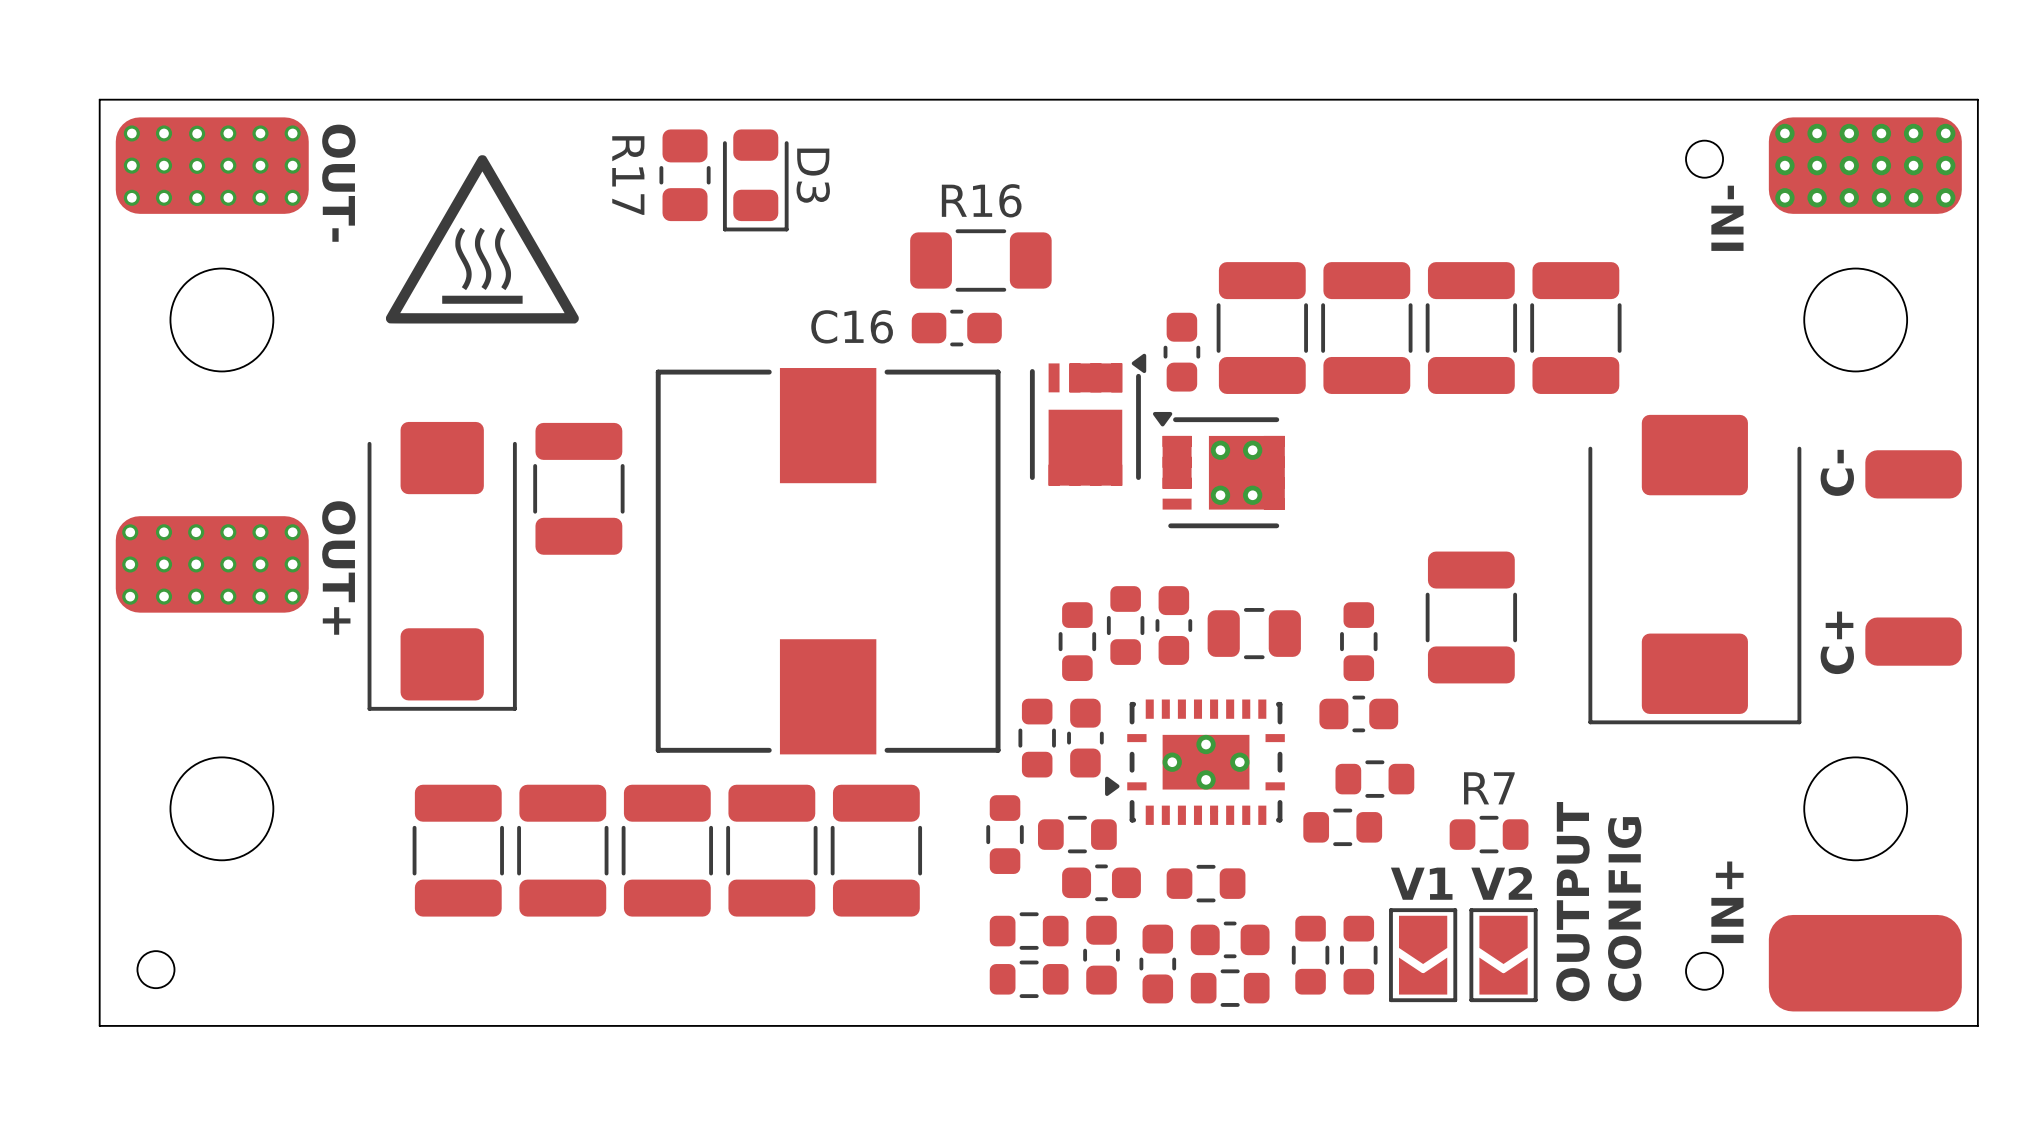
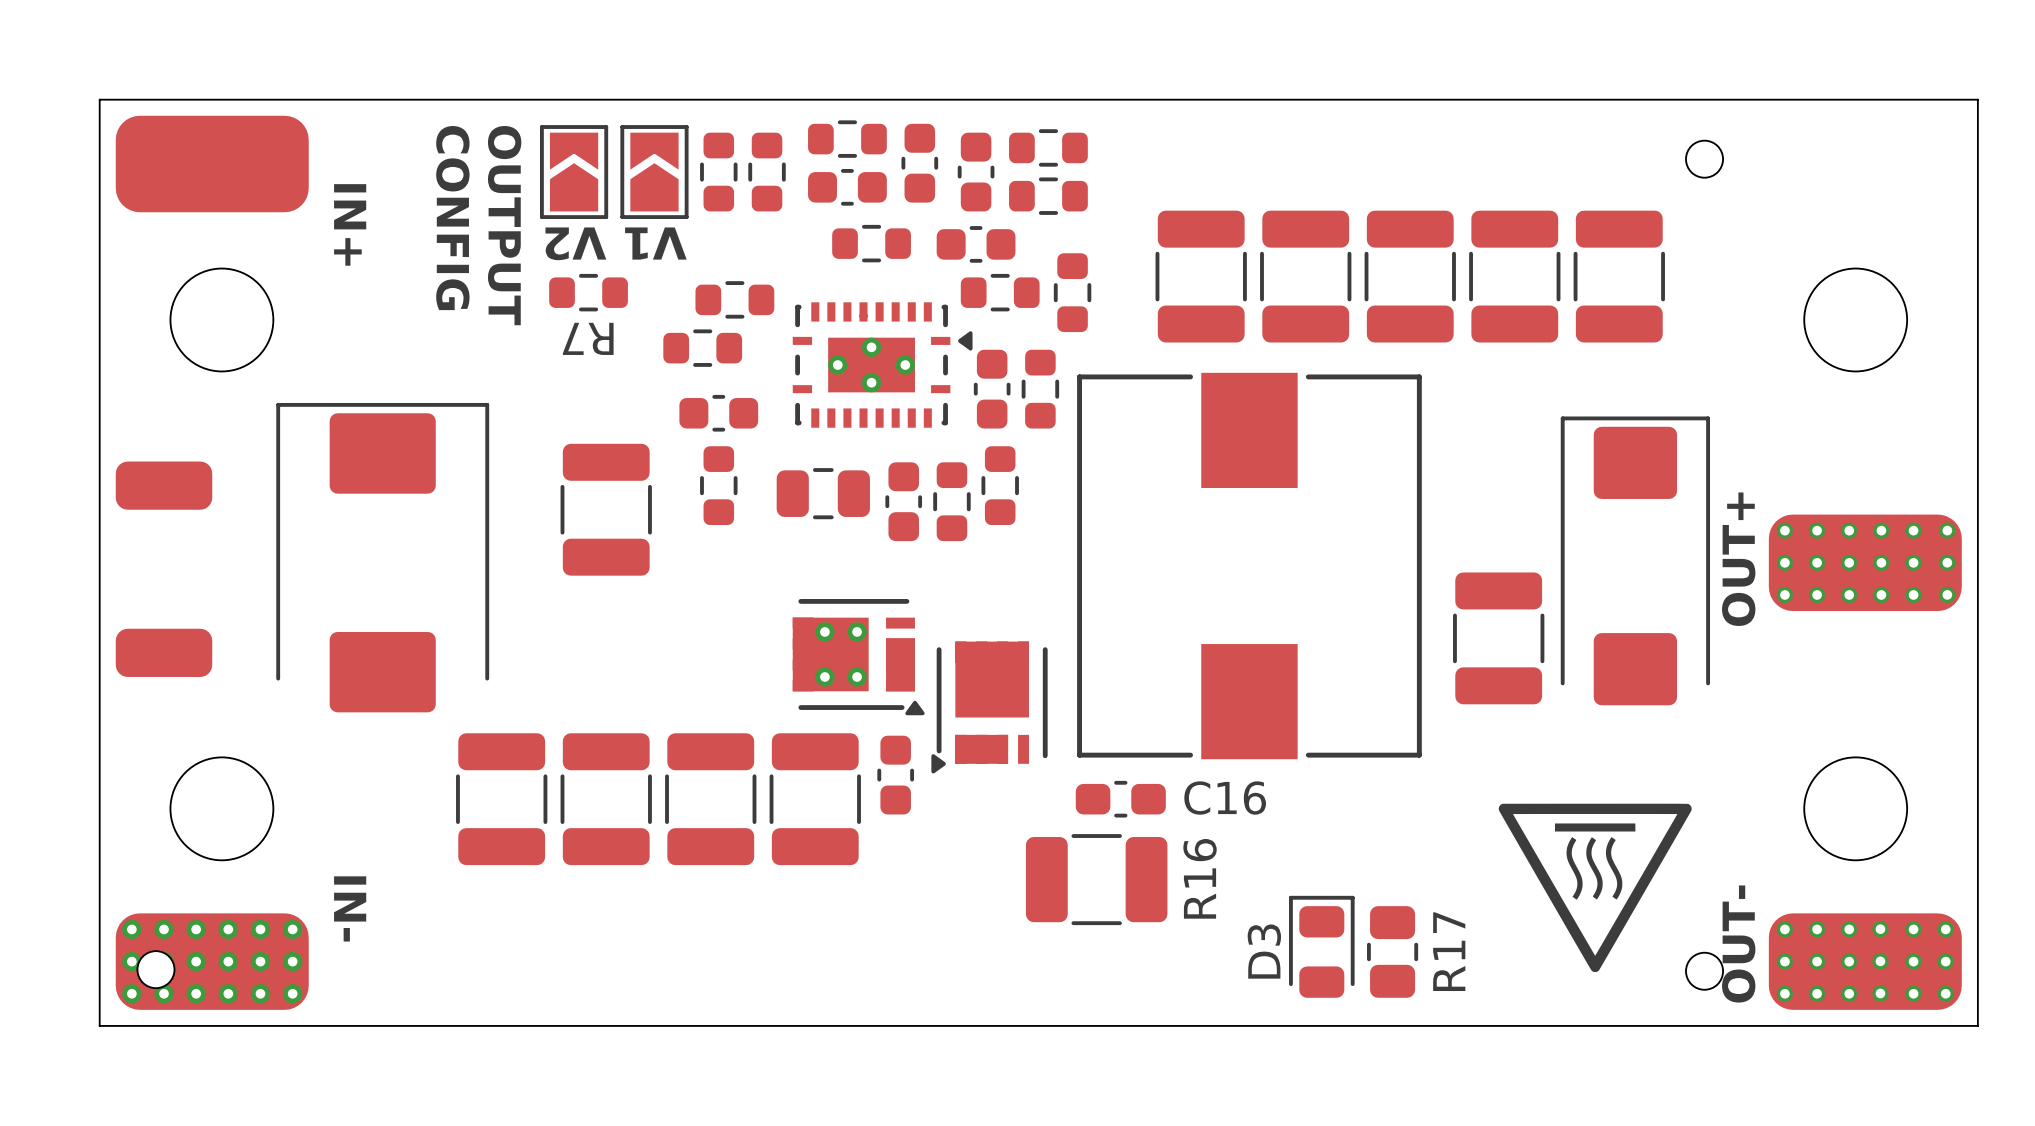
part footprint: [115, 117, 309, 214] -> [115, 115, 309, 213]
part: none -> (847, 139)
part: none -> (1048, 147)
drawing: [385, 155, 579, 324] -> none
part: none -> (919, 163)
part: (1865, 165) -> none
part: none -> (574, 172)
part: none -> (654, 172)
part: none -> (718, 172)
part: none -> (767, 172)
part: none -> (976, 172)
R17 name rotation: 0° (628, 175) -> 180° (1449, 951)
R17 name position: R17 (628, 175) -> R17 (1449, 951)
R17 position: (685, 175) -> (1392, 951)
D3 rotation: 0° (755, 180) -> 180° (1321, 946)
D3 position: (755, 180) -> (1321, 946)
text: OUT- (338, 183) -> IN+ (350, 224)
part: none -> (847, 187)
part: none -> (1048, 196)
R16 name position: R16 (981, 200) -> R16 (1200, 878)
text: none -> CONFIG (452, 218)
text: IN- (1727, 218) -> none
text: none -> OUTPUT (504, 225)
R16 footprint: [910, 229, 1052, 292] -> [1025, 834, 1168, 926]
text: none -> V2 (575, 243)
text: none -> V1 (655, 243)
part: none -> (871, 243)
part: none -> (976, 244)
part: none -> (1201, 276)
part: none -> (1305, 276)
part: none -> (1410, 276)
part: none -> (1514, 276)
part: none -> (1619, 276)
part: none -> (1000, 292)
part: none -> (1072, 292)
part: none -> (734, 299)
C16 name position: C16 (852, 326) -> C16 (1225, 798)
C16 position: (956, 328) -> (1120, 799)
part: (1262, 328) -> none
part: (1366, 328) -> none
part: (1471, 328) -> none
part: (1575, 328) -> none
part: none -> (702, 348)
part: (1181, 352) -> none
part: none -> (992, 389)
part: none -> (1040, 389)
part: none -> (718, 413)
part rotation: 0° (1088, 419) -> 180° (989, 707)
part position: (1088, 419) -> (989, 707)
part rotation: 0° (1218, 470) -> 180° (858, 657)
part position: (1218, 470) -> (858, 657)
text: C- (1837, 472) -> none
part: (1913, 474) -> none
part: none -> (164, 485)
part: none -> (718, 485)
part: none -> (1000, 485)
part position: (578, 488) -> (606, 509)
part: none -> (903, 501)
part: none -> (951, 501)
part: none -> (382, 557)
text: none -> OUT+ (1738, 559)
part: none -> (1635, 560)
part position: (828, 561) -> (1249, 566)
part: none -> (1865, 562)
part: (212, 564) -> none
part: (442, 566) -> none
text: OUT+ (338, 568) -> none
part: (1694, 569) -> none
part position: (1471, 617) -> (1498, 638)
part: (1125, 625) -> none
part: (1173, 625) -> none
part position: (1254, 633) -> (823, 493)
part: (1077, 641) -> none
part: (1358, 641) -> none
part: (1913, 641) -> none
text: C+ (1837, 642) -> none
part: none -> (164, 652)
part: (1358, 713) -> none
part: (1037, 738) -> none
part: (1085, 738) -> none
part rotation: 0° (1194, 762) -> 180° (882, 365)
part position: (1194, 762) -> (882, 365)
part: none -> (895, 775)
part: (1374, 779) -> none
R7 name rotation: 0° (1489, 788) -> 180° (588, 338)
R7 name position: R7 (1489, 788) -> R7 (588, 338)
part: none -> (501, 799)
part: none -> (606, 799)
part: none -> (710, 799)
part: none -> (815, 799)
drawing: none -> [1498, 803, 1692, 972]
part: (1342, 827) -> none
part: (1005, 834) -> none
part: (1077, 834) -> none
R7 position: (1489, 834) -> (588, 292)
part: (458, 850) -> none
part: (562, 850) -> none
part: (667, 850) -> none
part: (771, 850) -> none
part: (876, 850) -> none
part: (1101, 882) -> none
part: (1206, 883) -> none
text: V1 (1421, 883) -> none
text: V2 (1501, 883) -> none
text: OUTPUT (1572, 901) -> none
text: IN+ (1727, 902) -> OUT- (1738, 944)
text: none -> IN- (350, 908)
text: CONFIG (1624, 909) -> none
part footprint: [1768, 914, 1962, 1012] -> [1768, 913, 1962, 1010]
part: (1029, 931) -> none
part: (1230, 939) -> none
part: (1101, 955) -> none
part: (1310, 955) -> none
part: (1358, 955) -> none
part: (1423, 955) -> none
part: (1503, 955) -> none
part: none -> (212, 961)
part: (1157, 964) -> none
part: (1029, 979) -> none
part: (1230, 988) -> none

